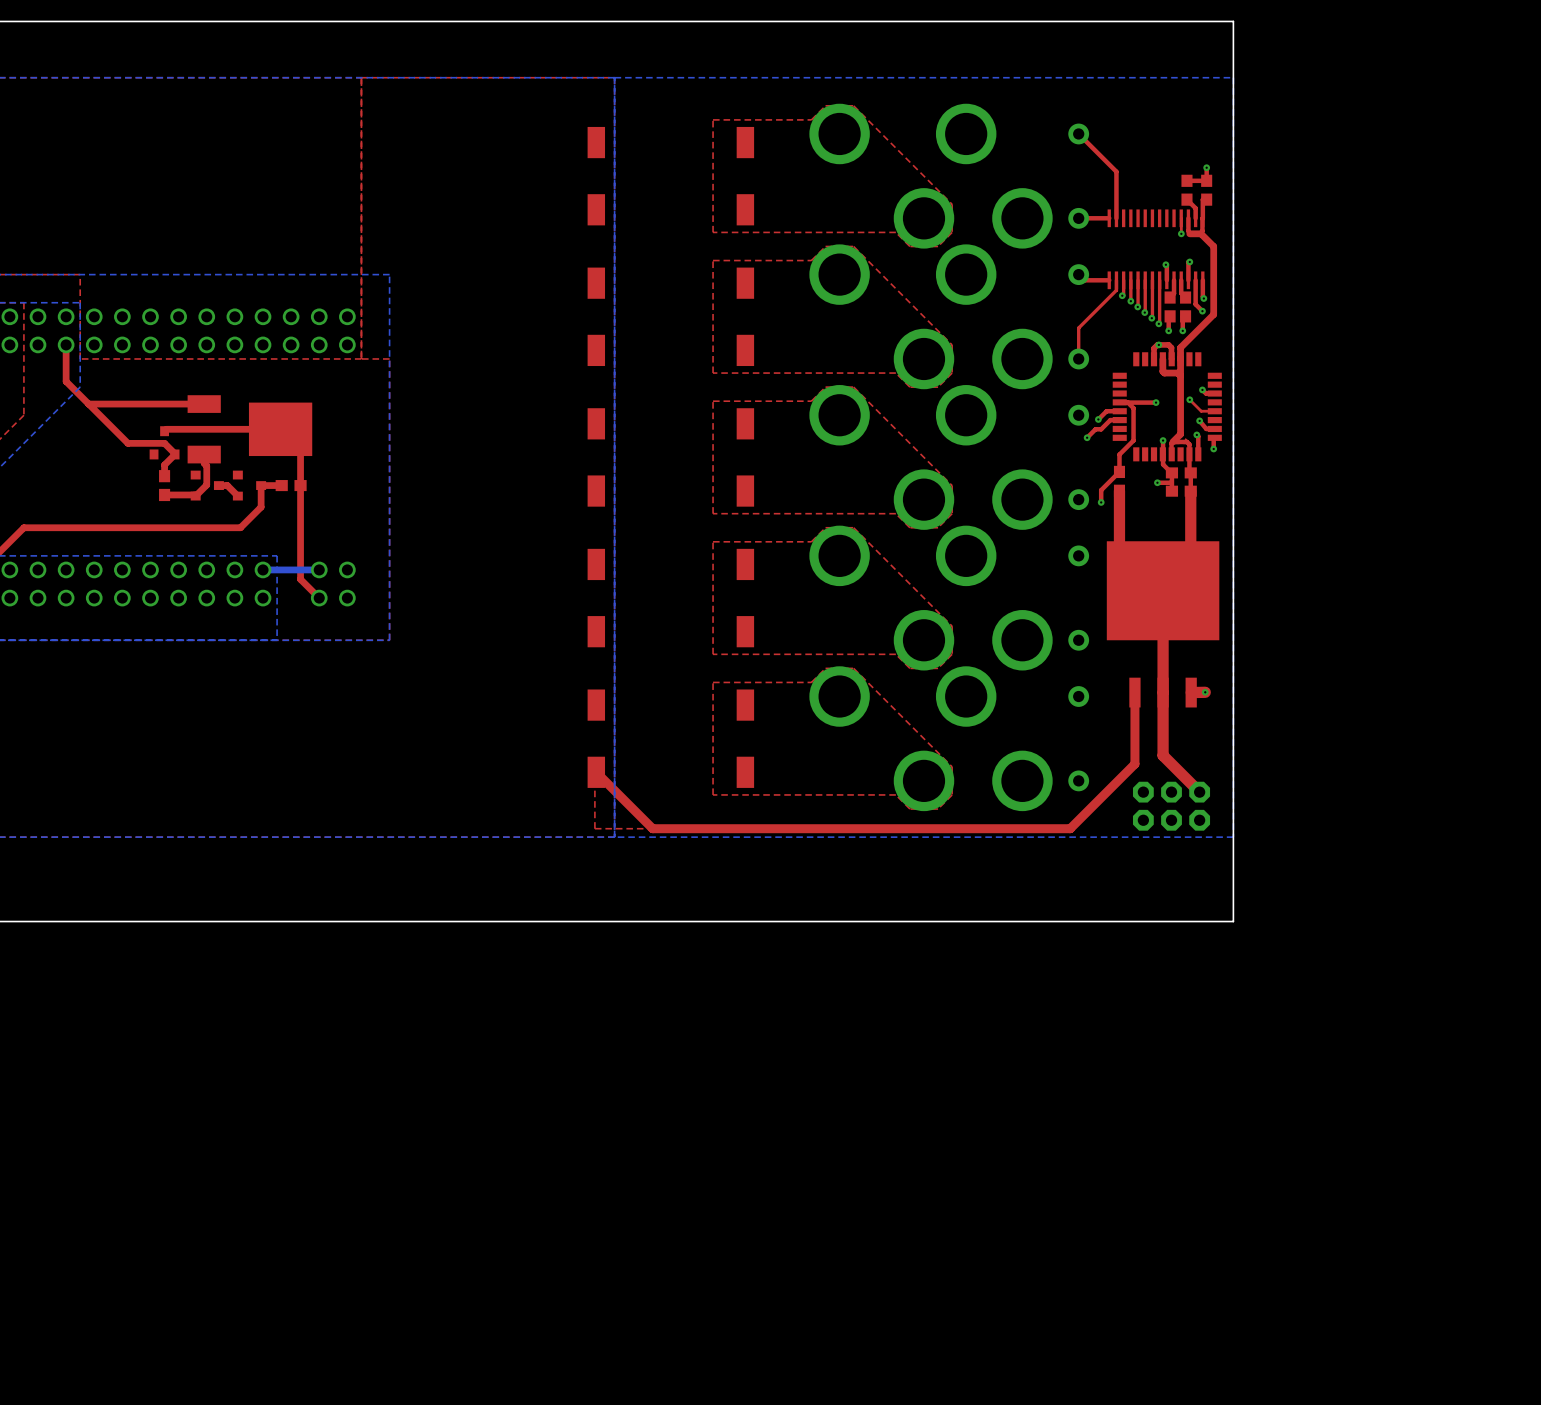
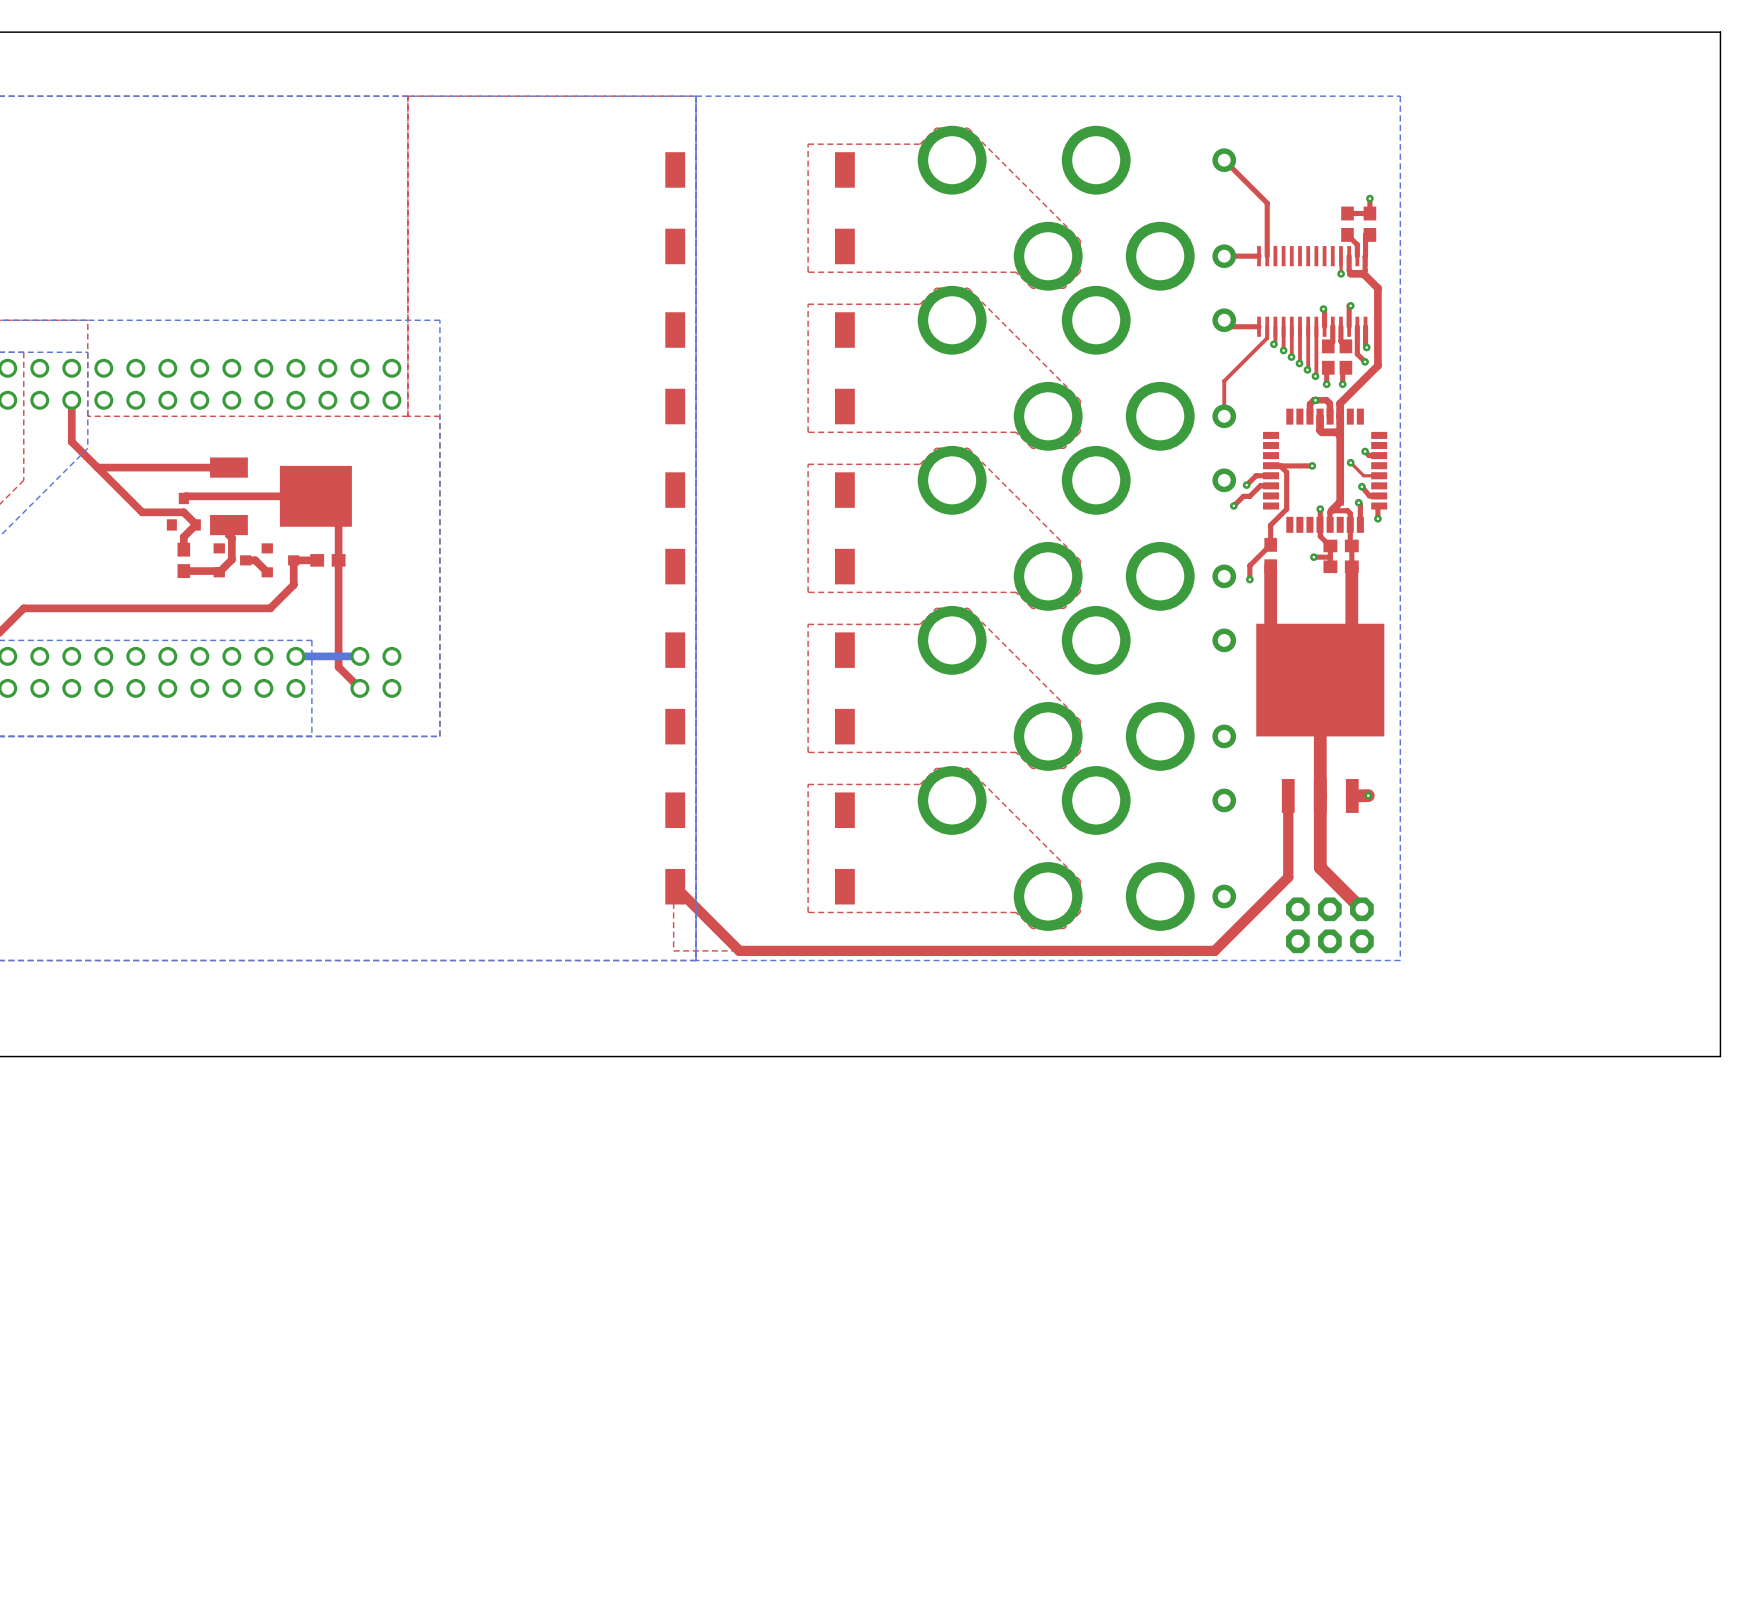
board edge: (1233, 21) (1233, 921) -> (1400, 32) (1720, 32) (1720, 1056) (1400, 1056)

